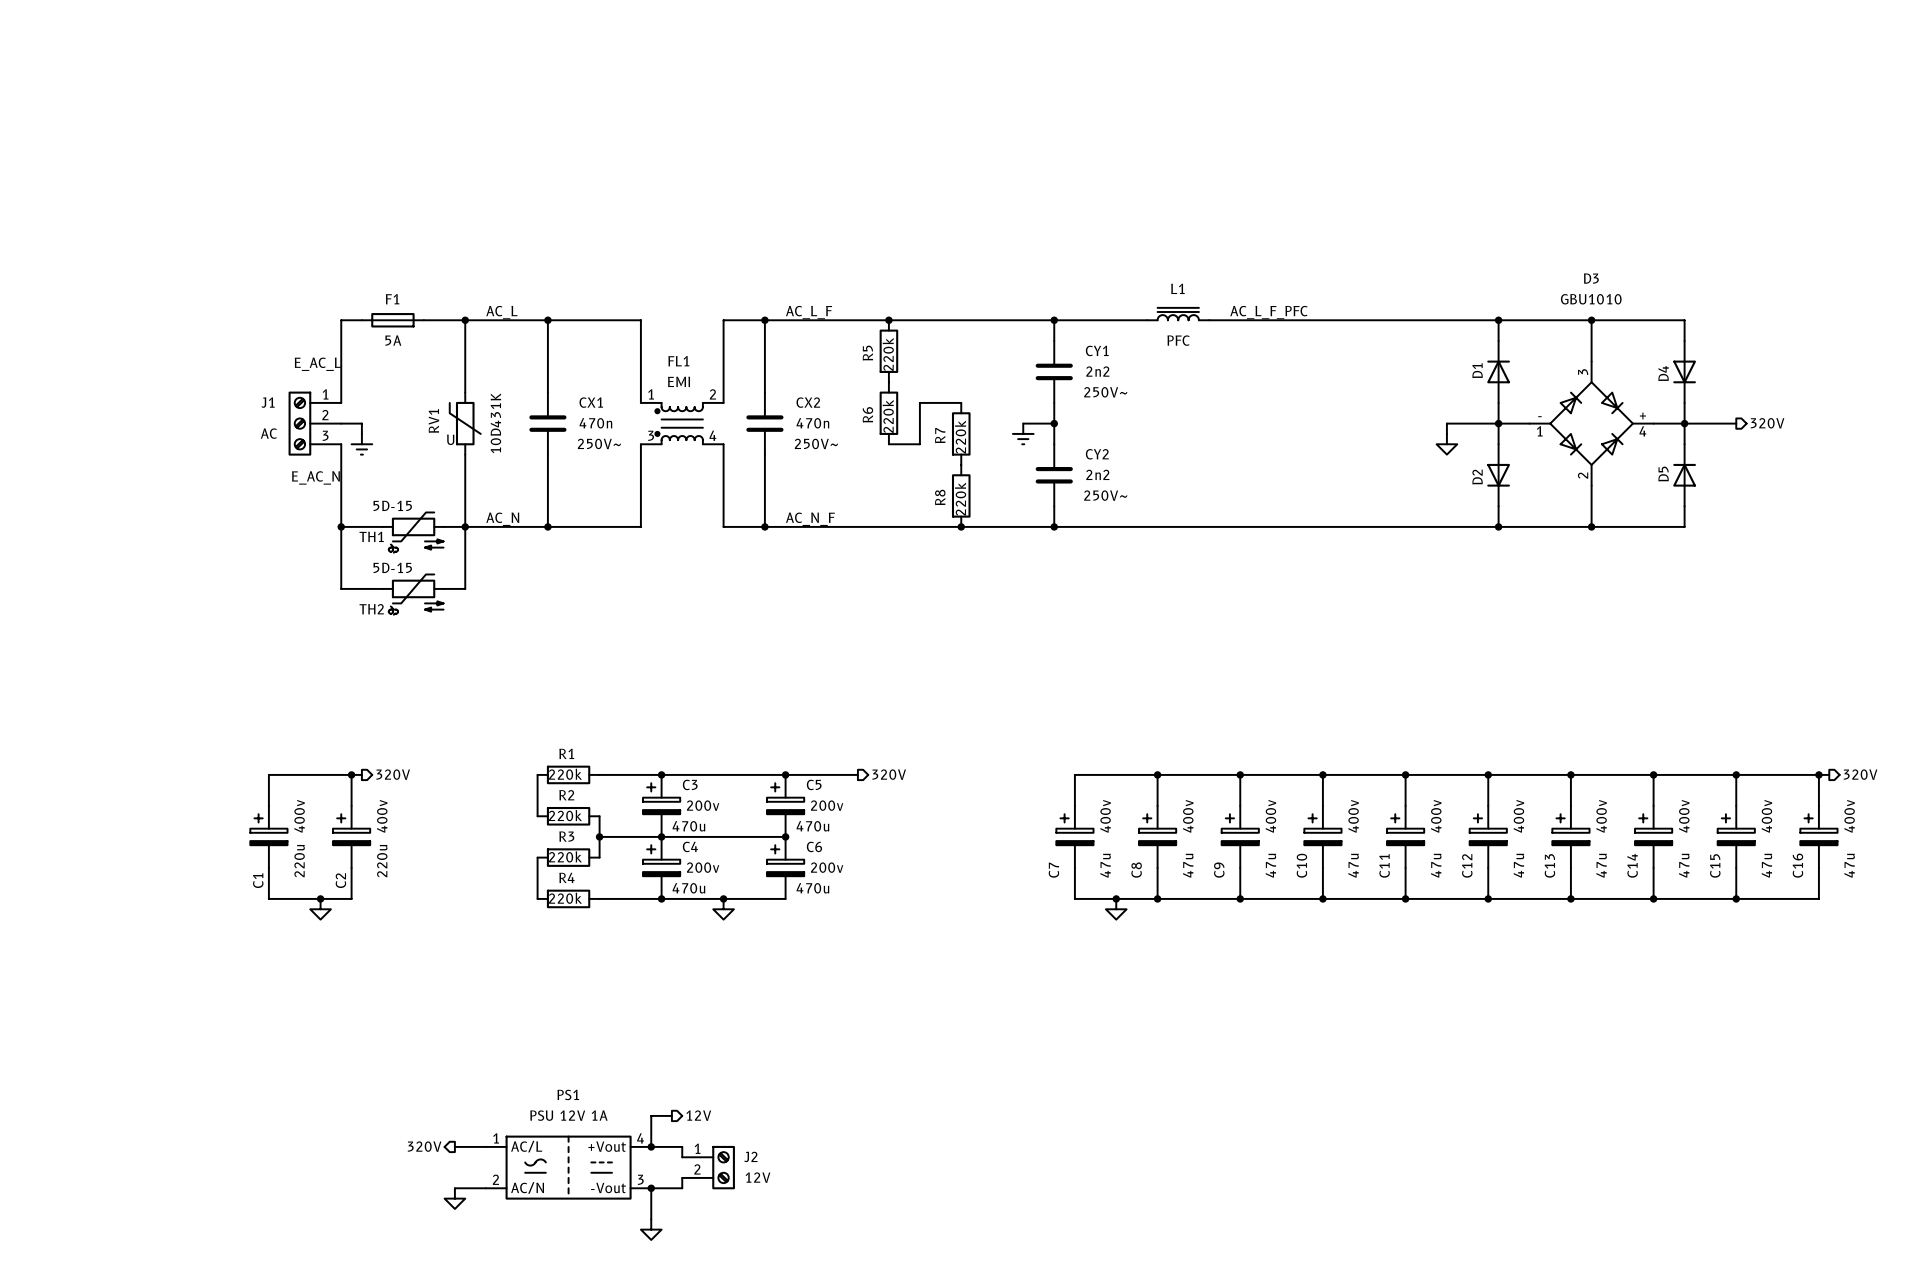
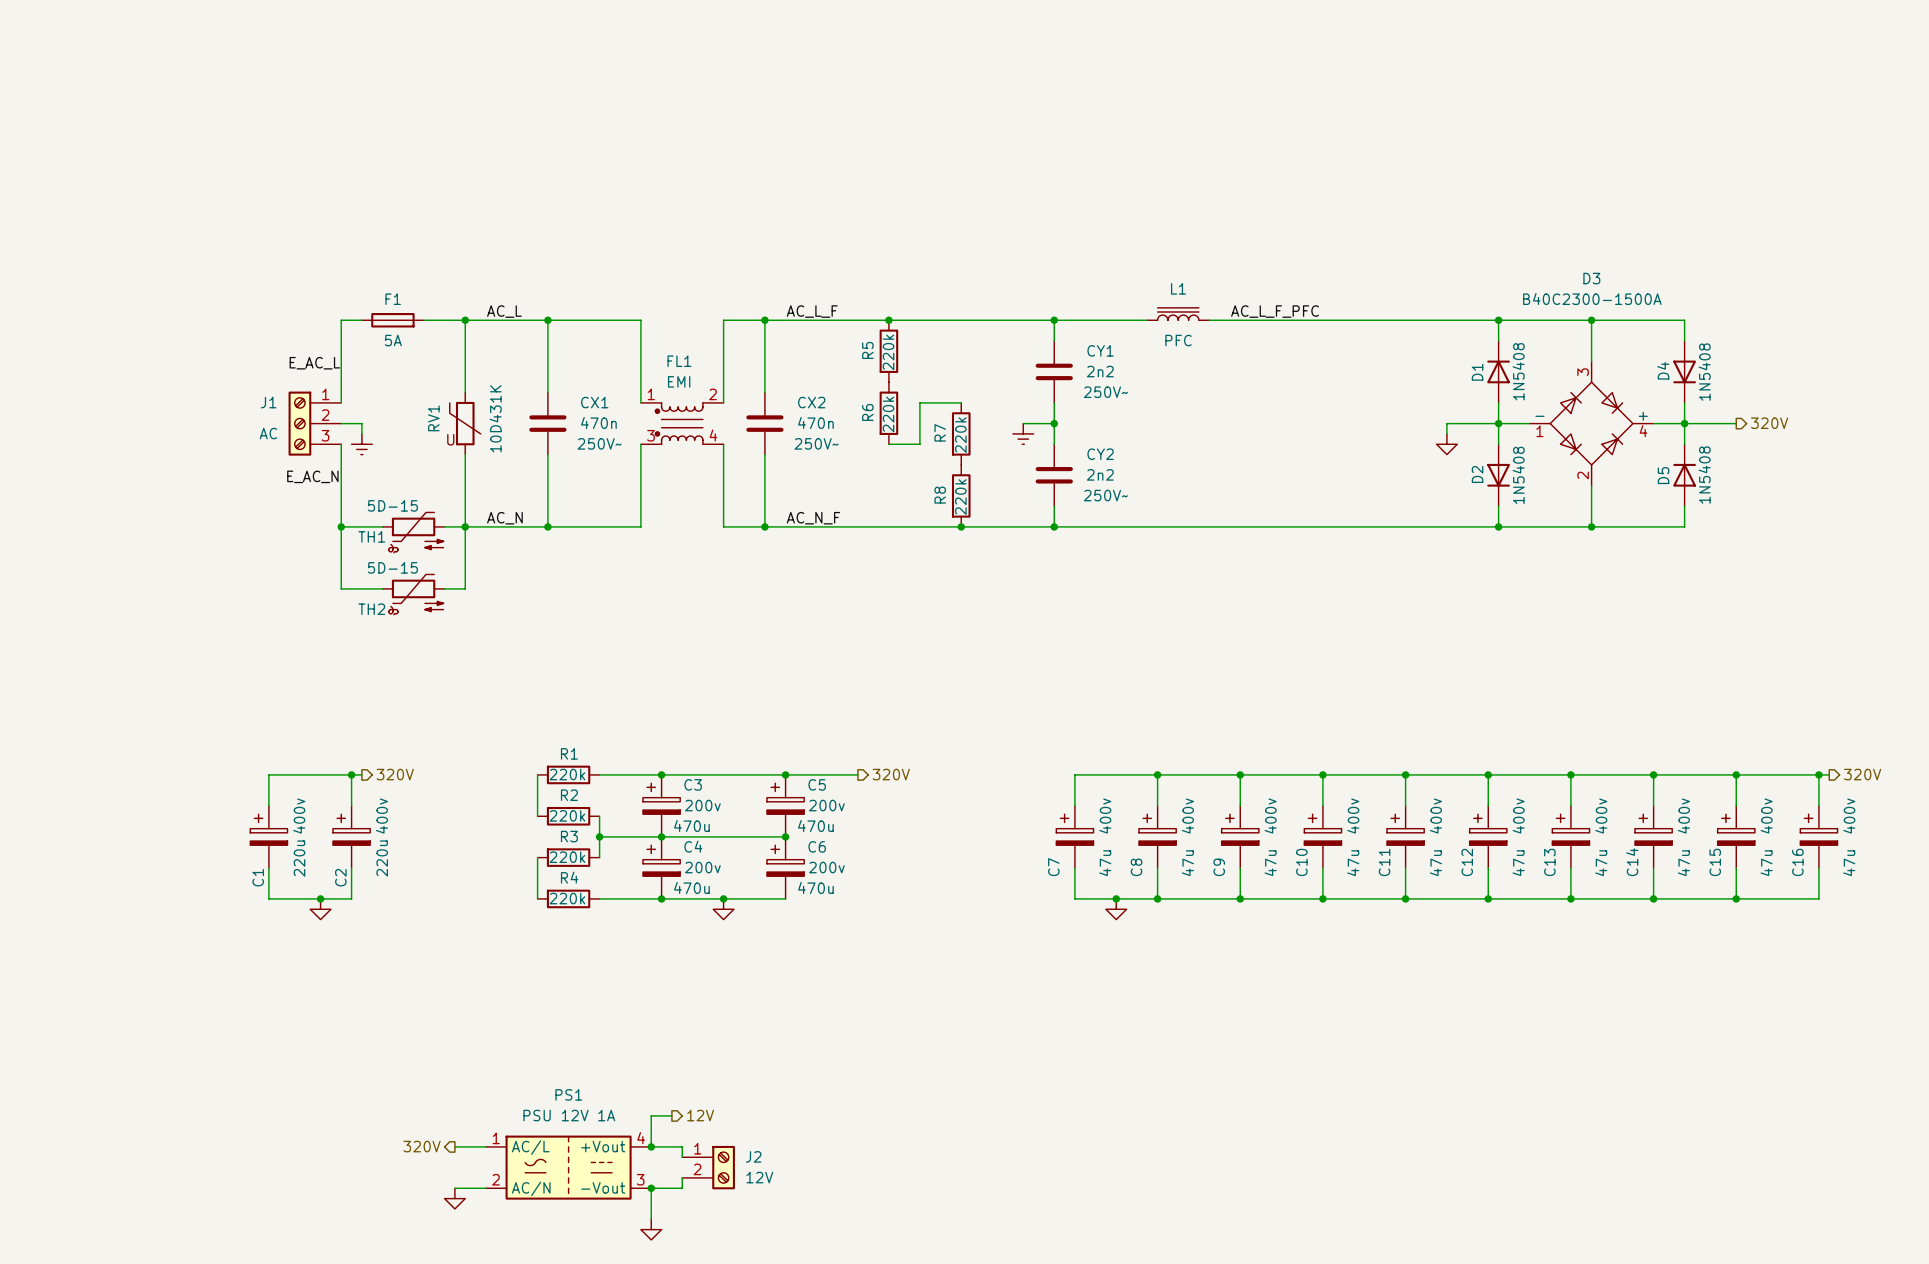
D3 value: GBU1010 (1591, 299) -> B40C2300-1500A (1592, 298)
D1 value: none -> 1N5408 (1518, 371)
D4 value: none -> 1N5408 (1704, 372)
D5 value: none -> 1N5408 (1704, 475)
D2 value: none -> 1N5408 (1518, 475)

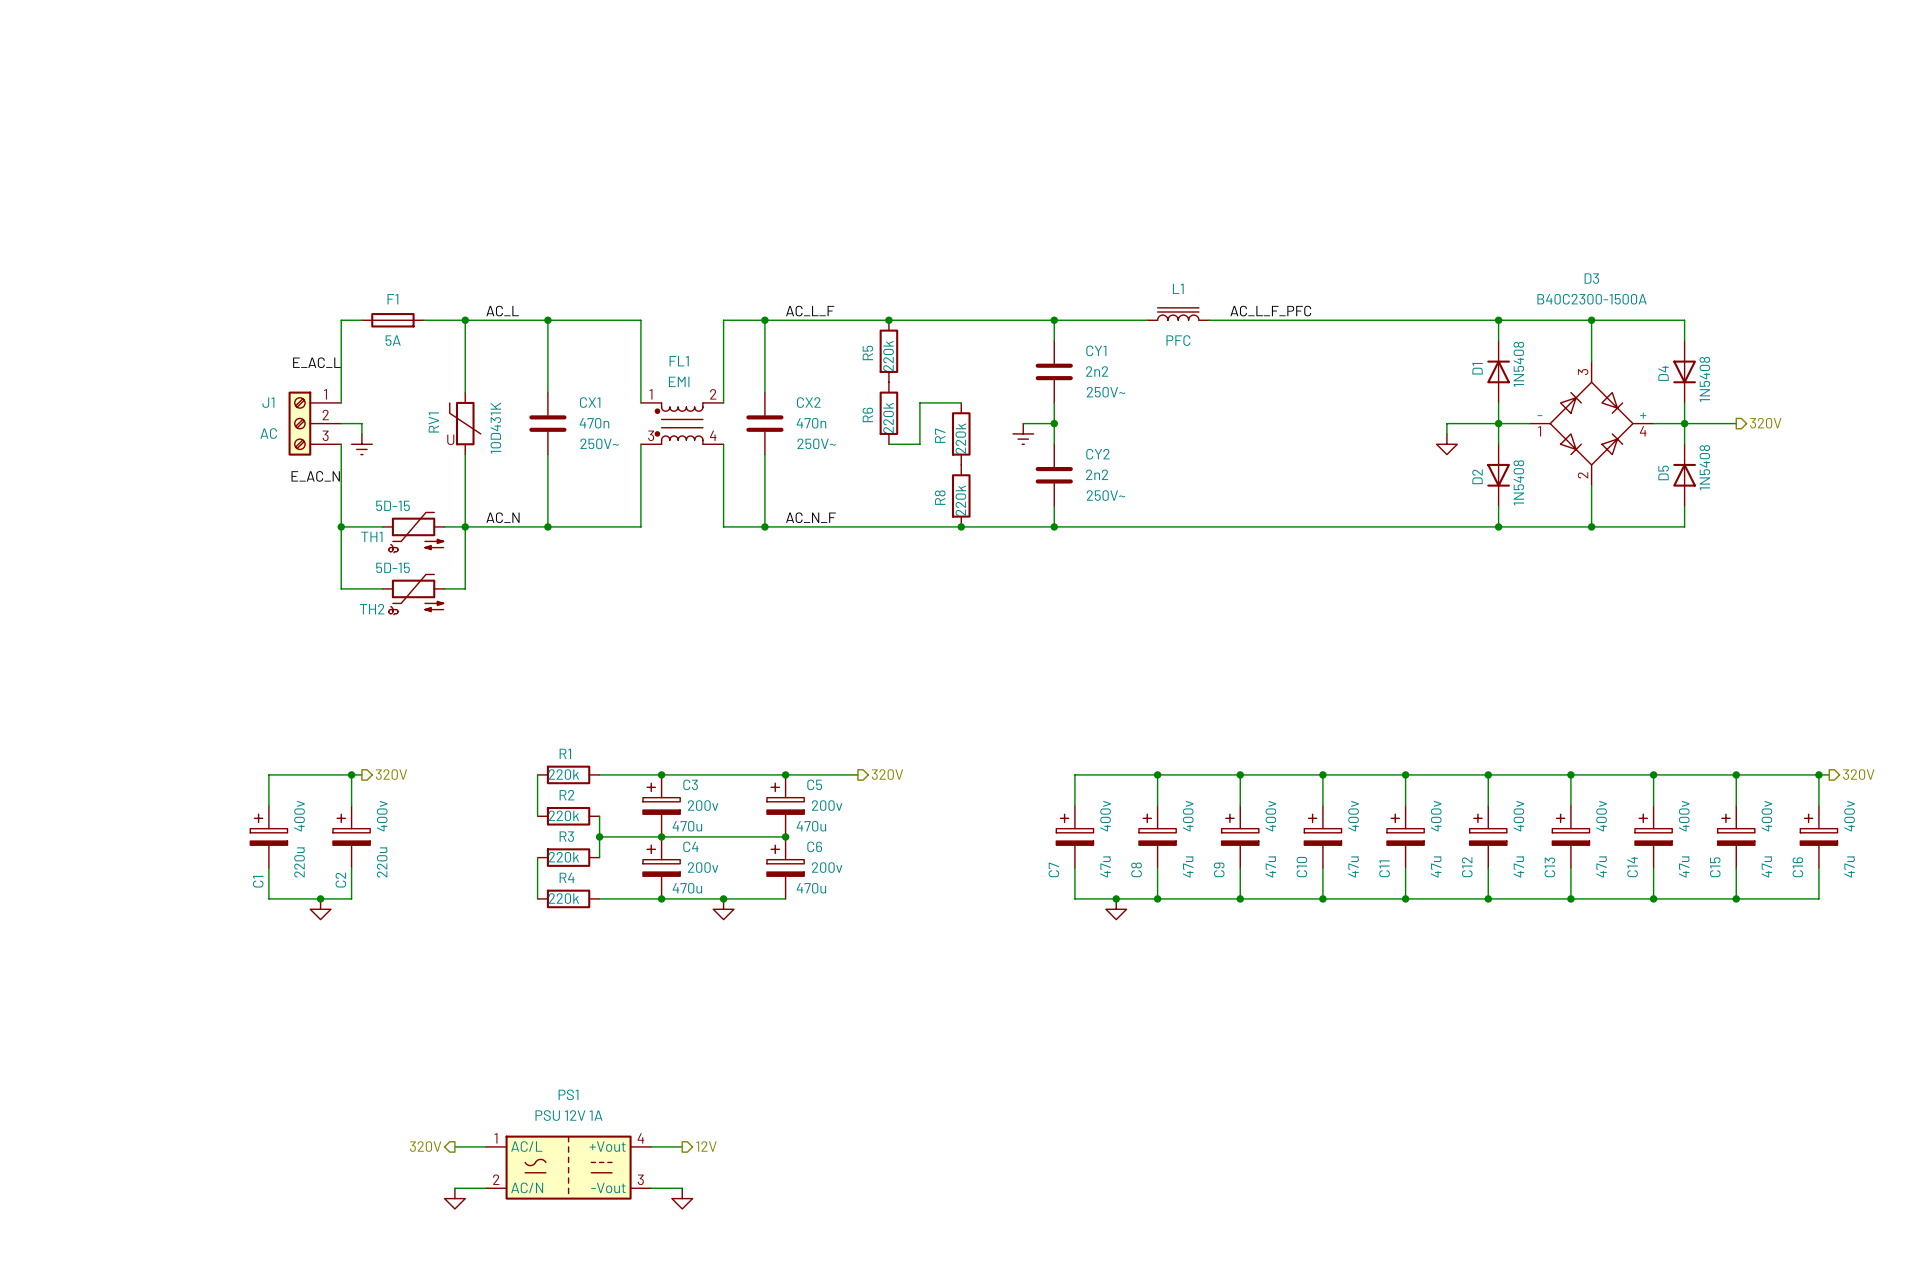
wire: (671, 1115) (651, 1115) (651, 1146) -> none
hierarchical label position: 12V (700, 1115) -> 12V (706, 1146)
junction: (651, 1146) -> none
J2: 12V (708, 1167) -> none
wire: (682, 1177) (682, 1188) -> none
wire: (651, 1188) (651, 1219) -> none
junction: (651, 1188) -> none
power symbol position: (651, 1229) -> (682, 1198)

